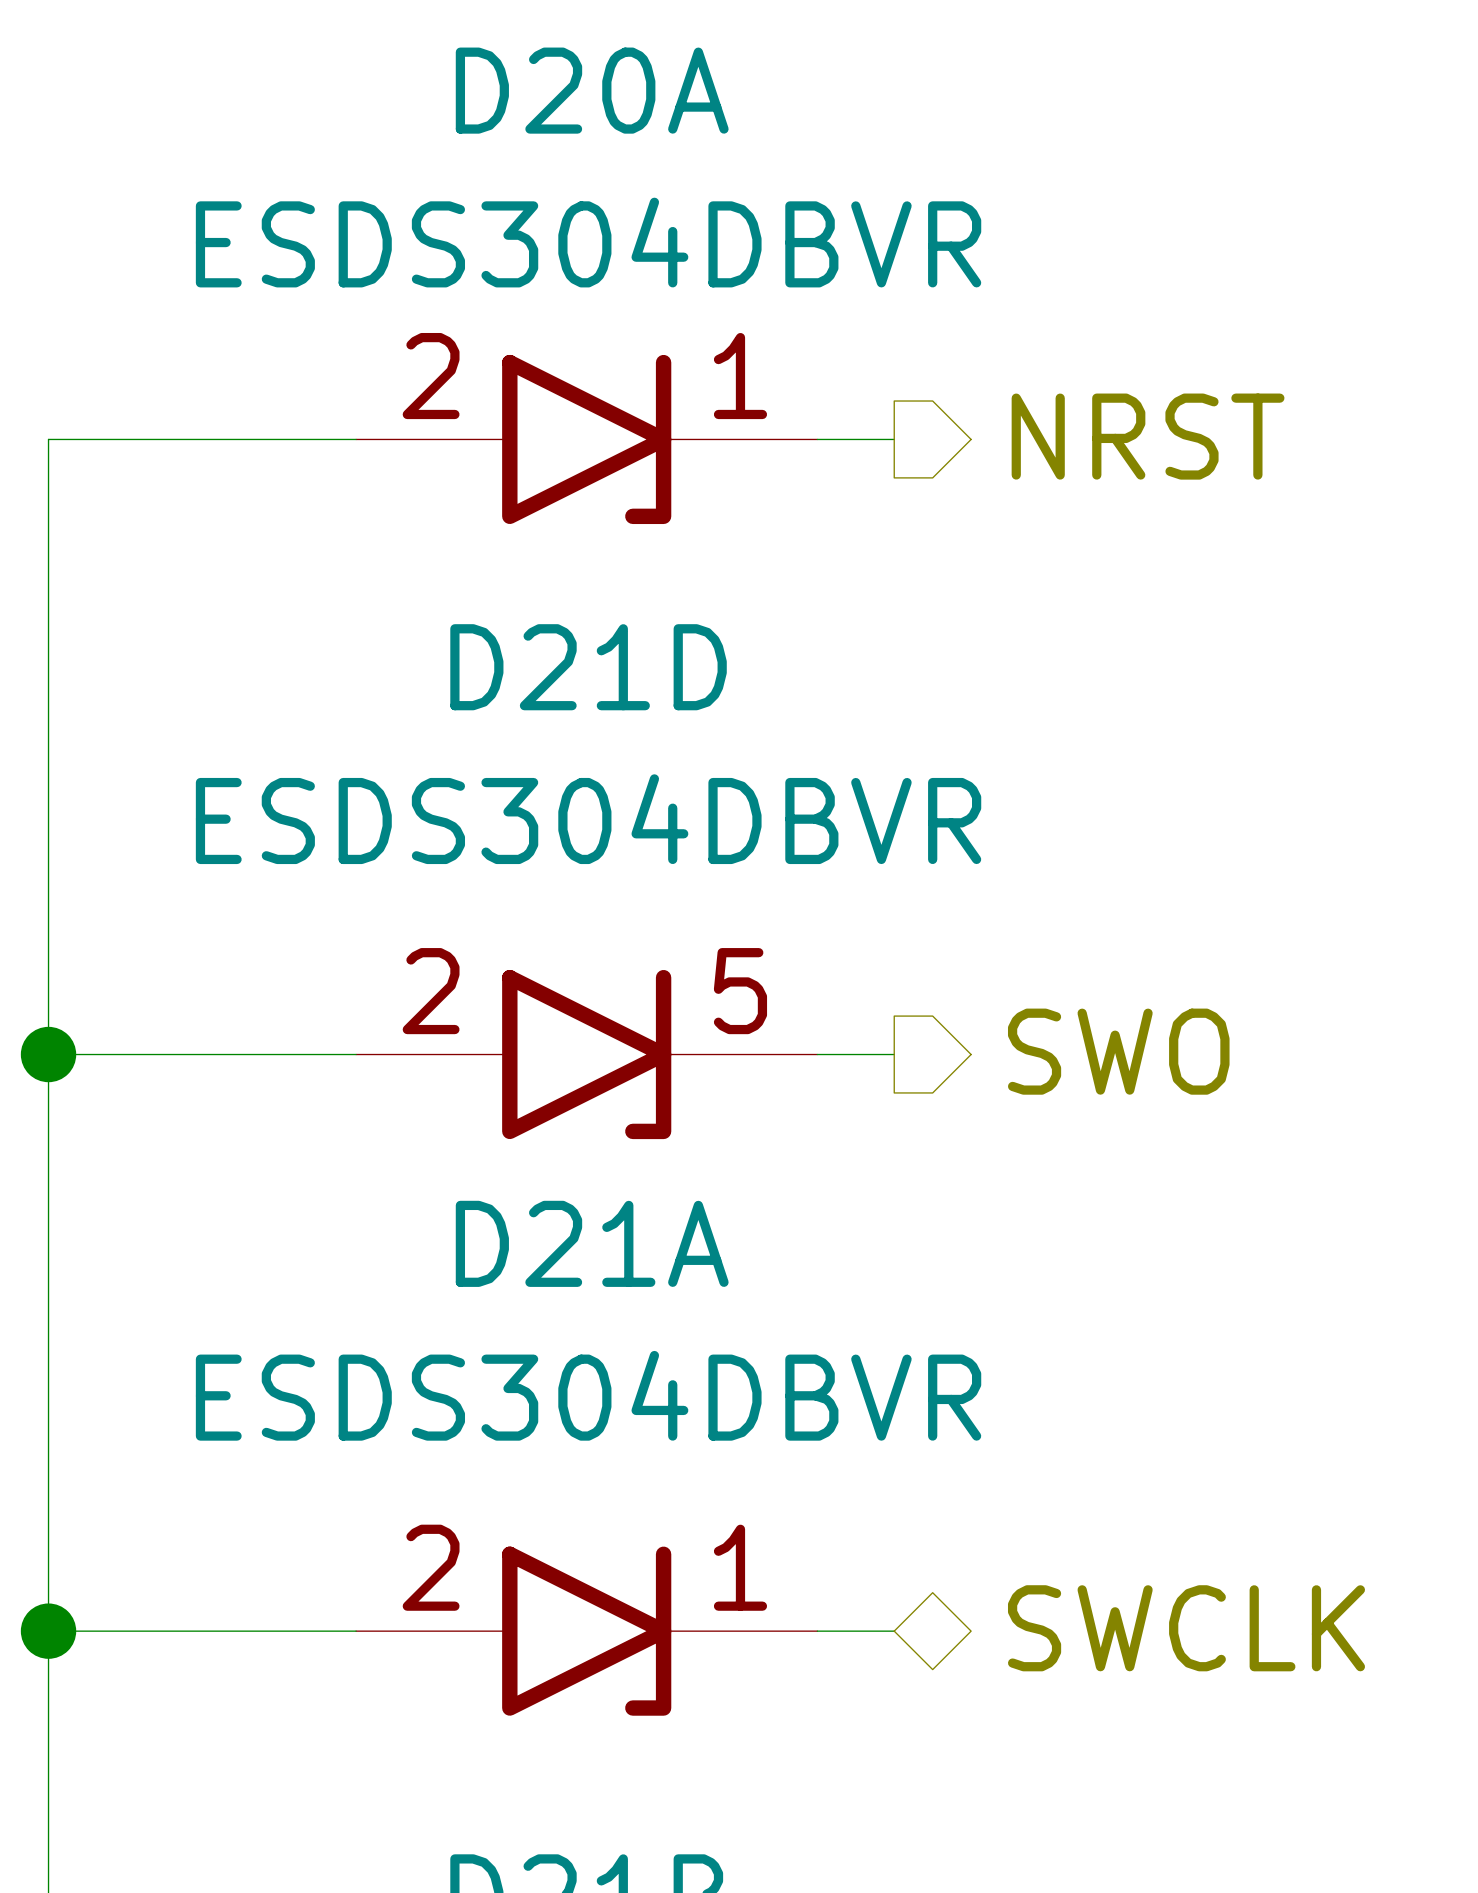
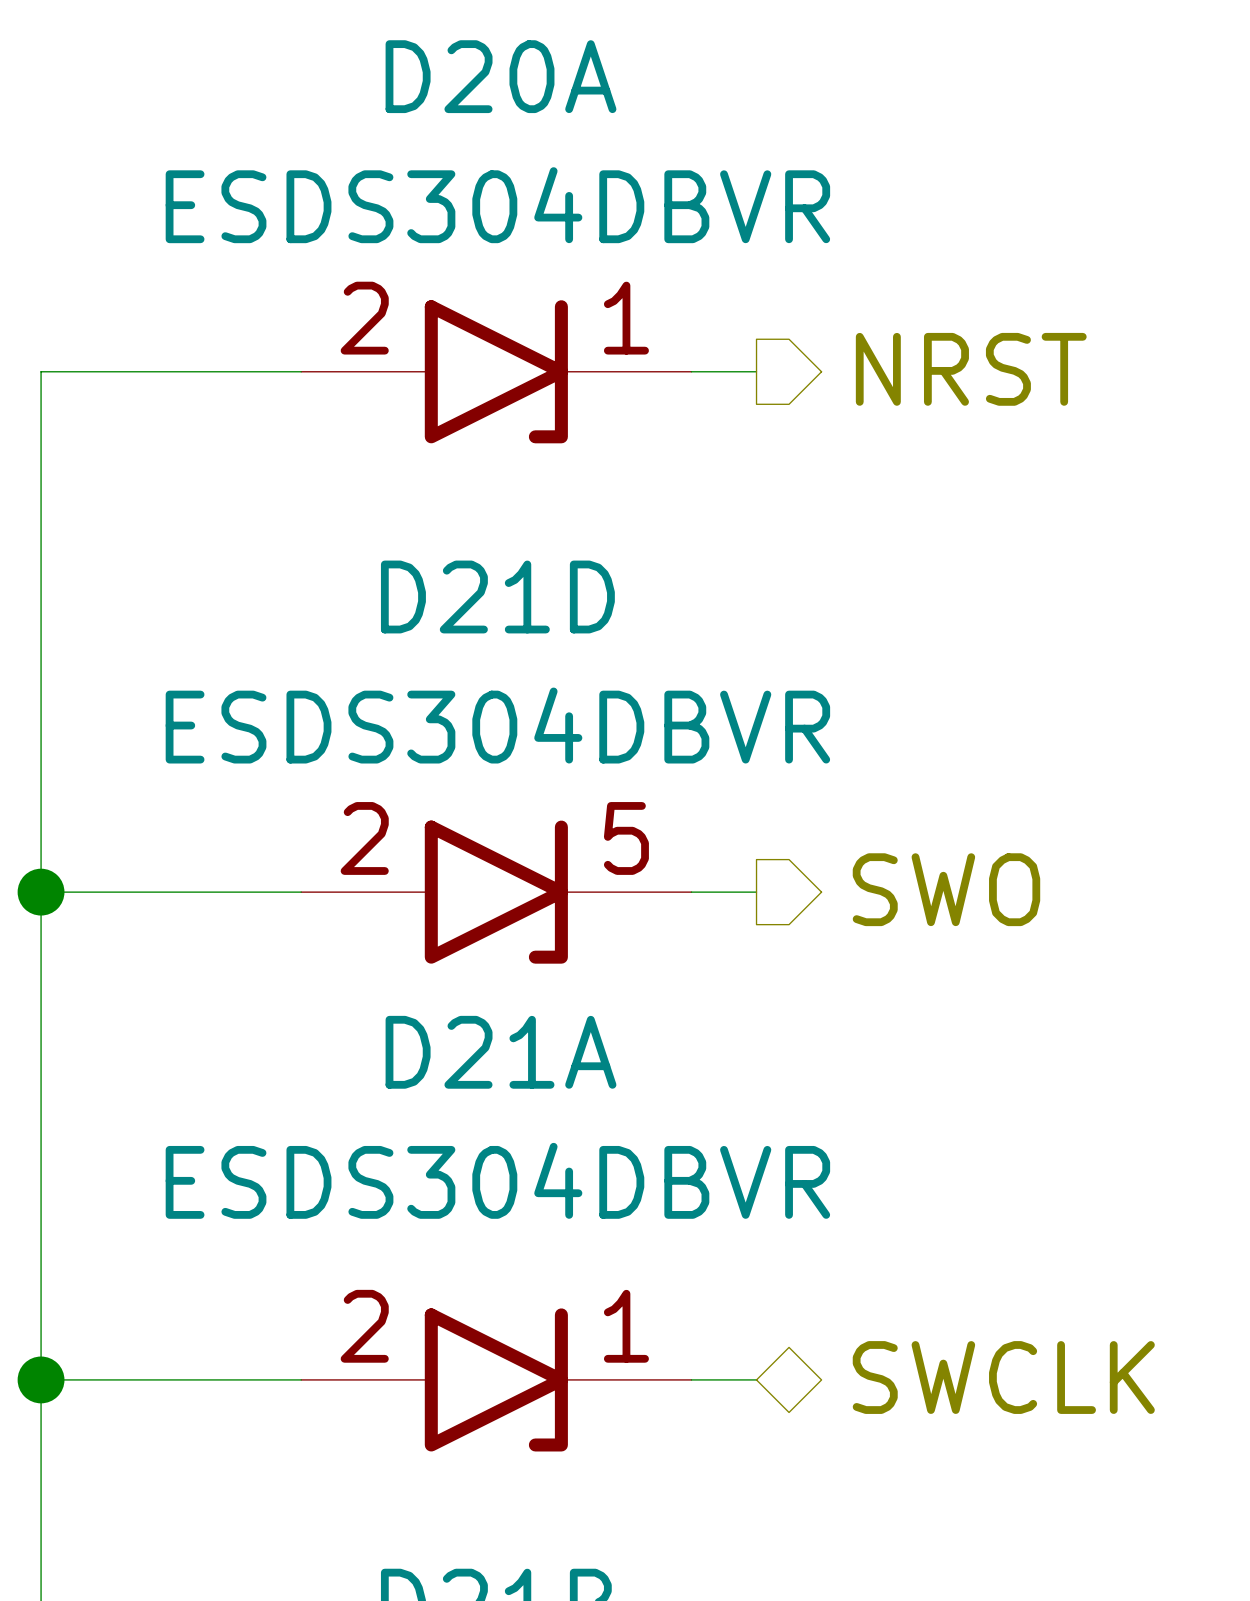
D21D name position: D21D (588, 667) -> D21D (497, 596)
D21D value position: ESDS304DBVR (588, 819) -> ESDS304DBVR (497, 725)

